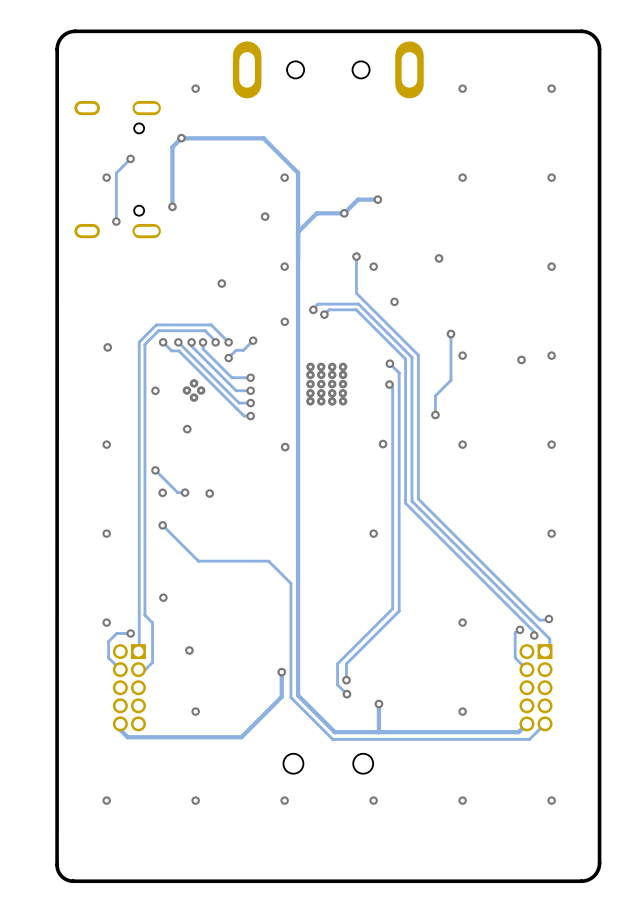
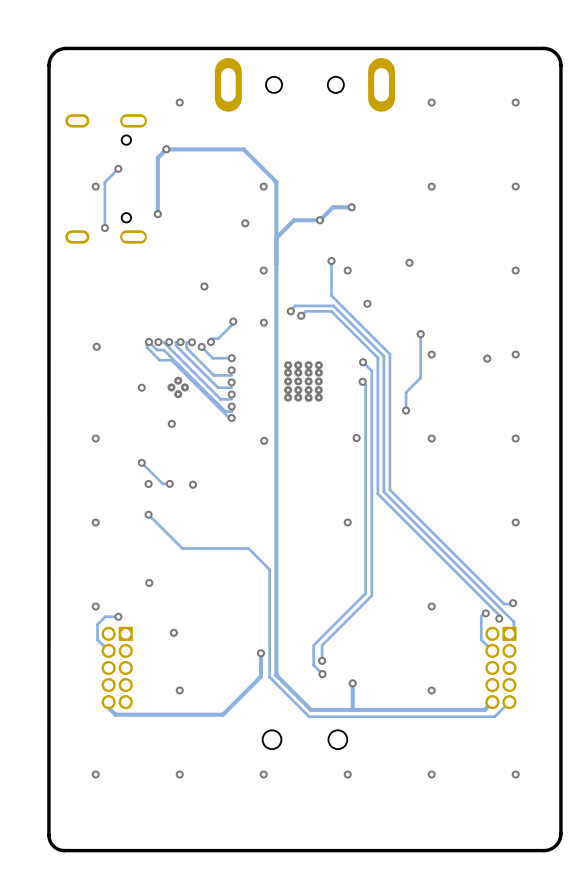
track: none -> (233, 321) (218, 338) (210, 338)
via: none -> (233, 321)
track: (253, 340) (243, 350) (236, 350) (228, 358) -> none
via: (253, 340) -> none
track: none -> (147, 342) (147, 347) (159, 360) (171, 360) (229, 418) (231, 418)
via: none -> (158, 342)
via: (178, 342) -> none
via: none -> (169, 342)
via: (191, 342) -> none
via: none -> (180, 342)
via: (203, 342) -> none
via: none -> (192, 342)
track: (215, 342) (205, 330) (158, 330) (144, 344) (144, 615) (152, 622) (152, 662) (145, 669) (138, 669) -> none
via: (215, 342) -> none
track: (228, 342) (211, 324) (156, 324) (139, 342) (138, 651) -> none
via: none -> (201, 346)
track: none -> (202, 347) (212, 358) (231, 358)
via: (228, 358) -> none
via: none -> (231, 358)
via: none -> (231, 370)
via: (250, 377) -> none
via: none -> (231, 382)
via: (250, 390) -> none
via: none -> (231, 394)
via: (250, 403) -> none
via: none -> (231, 406)
via: (250, 416) -> none
via: none -> (231, 418)

